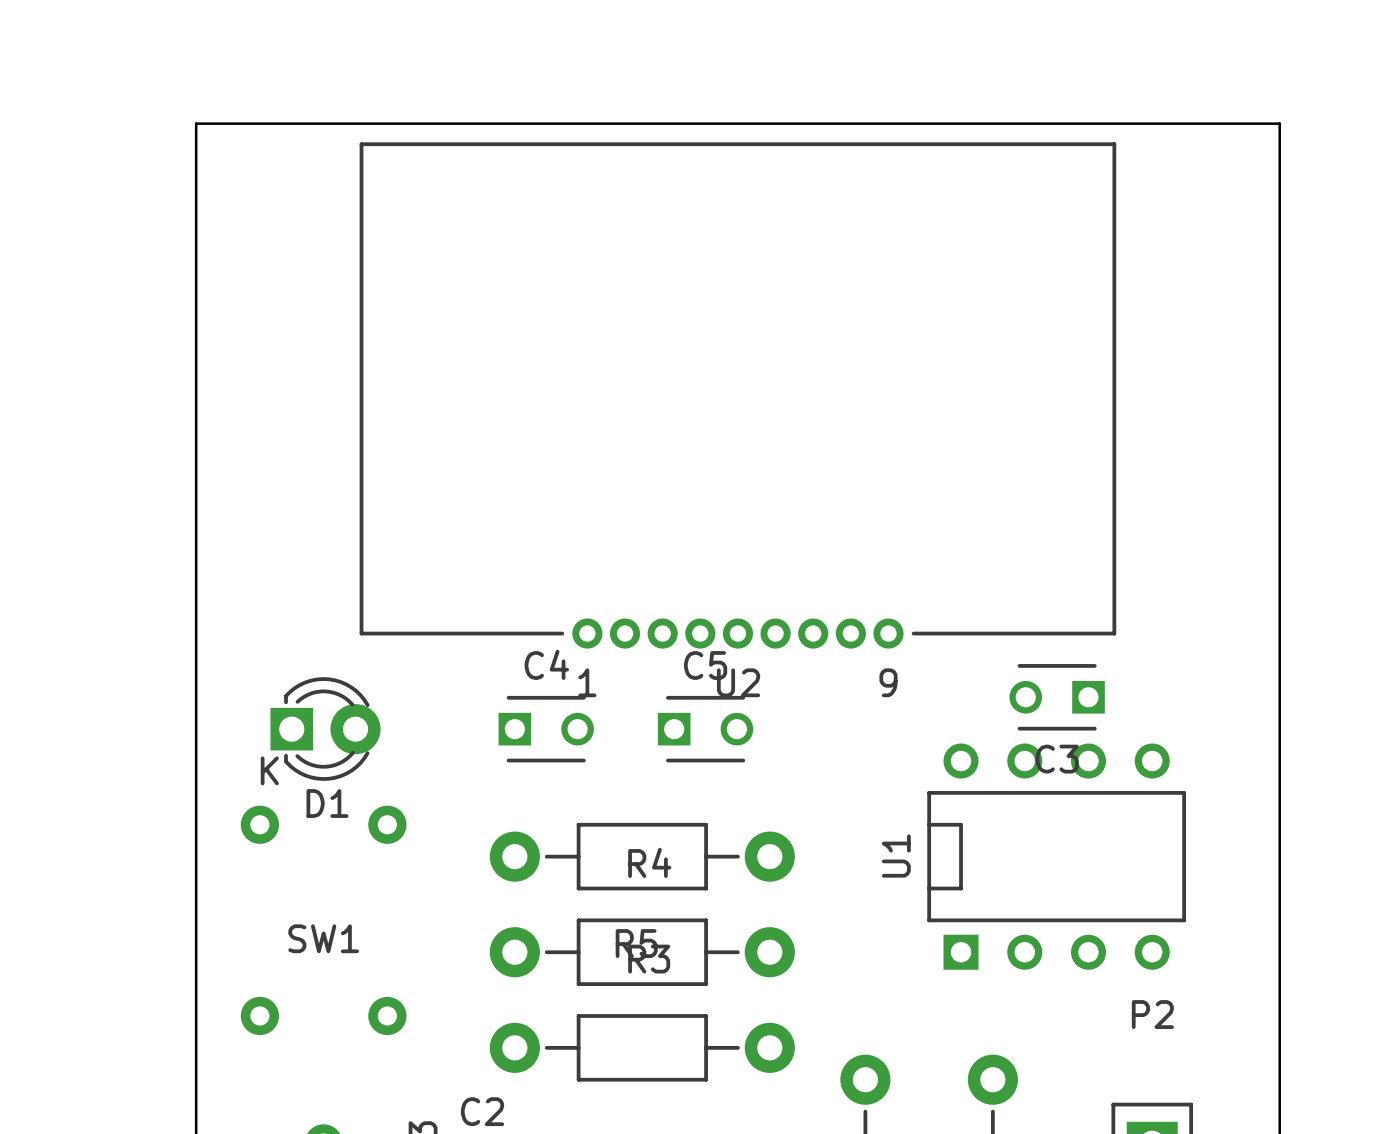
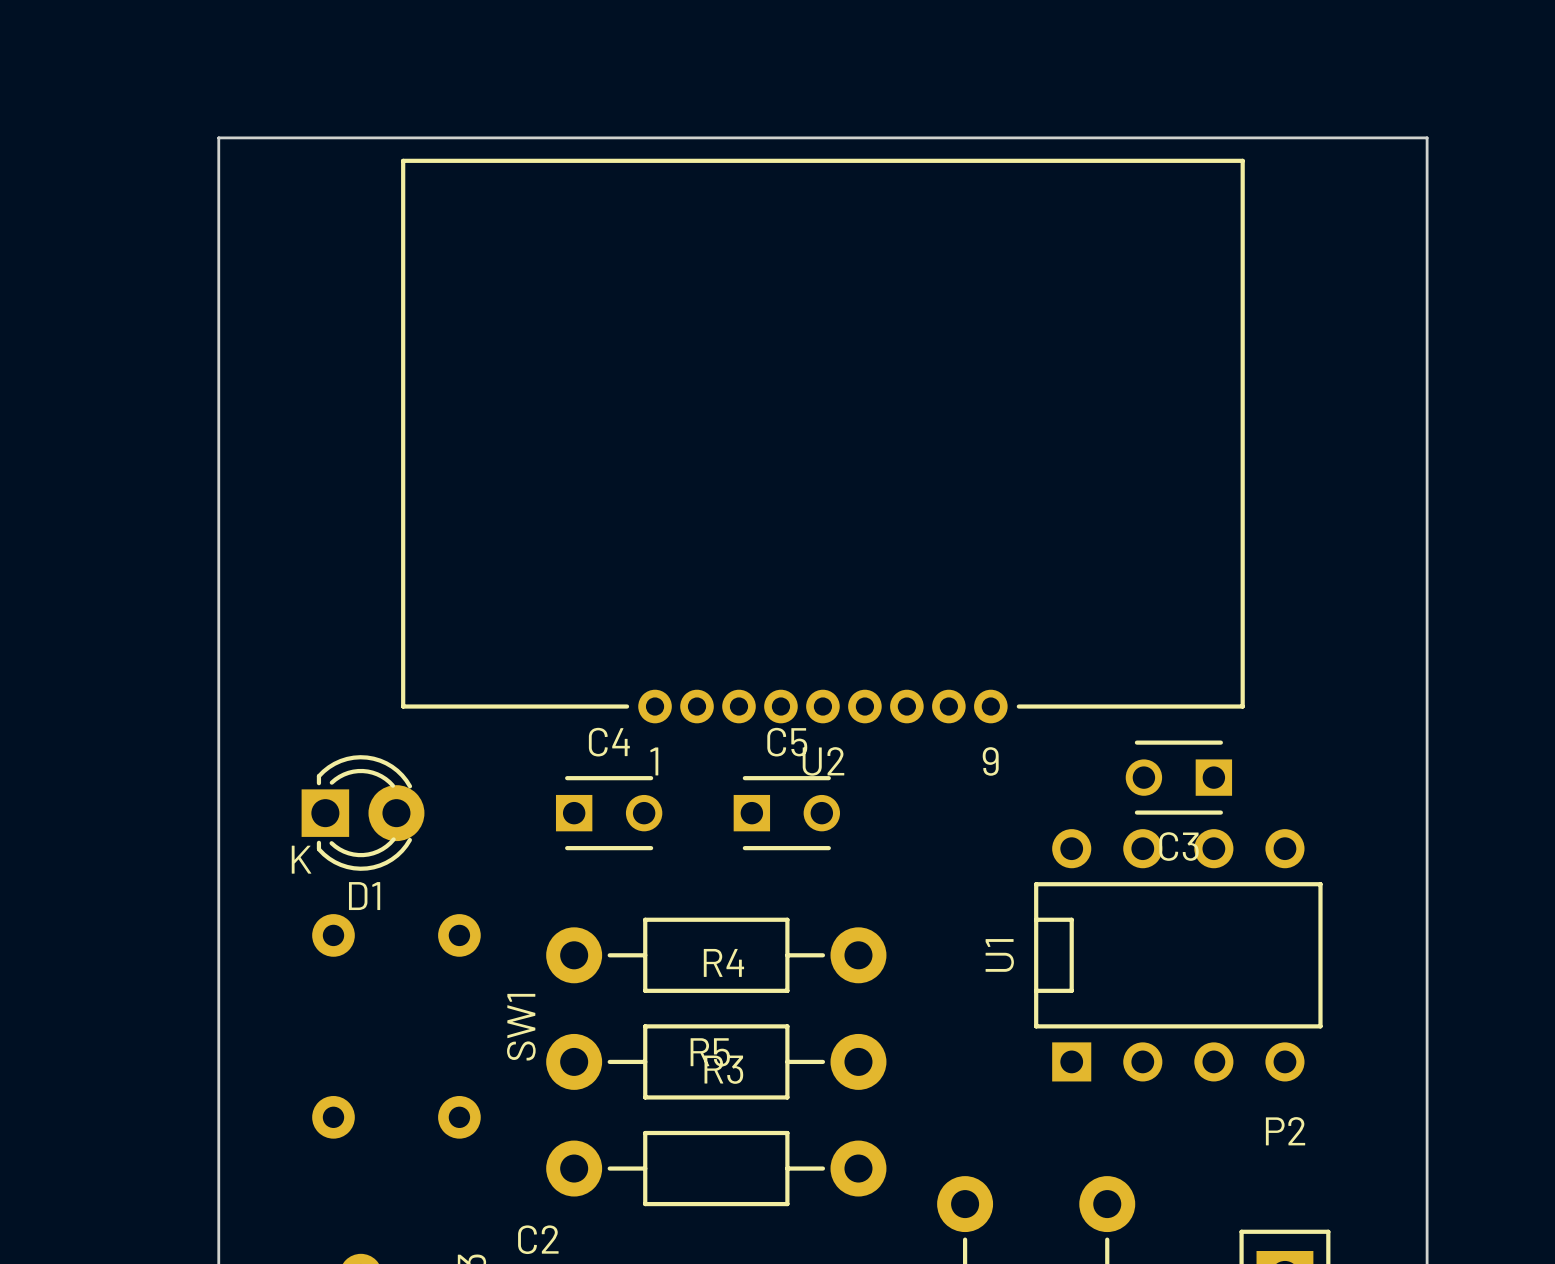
SW1 footprint: [240, 805, 407, 1036] -> [312, 914, 481, 1139]
SW1 name position: SW1 (323, 938) -> SW1 (521, 1027)

